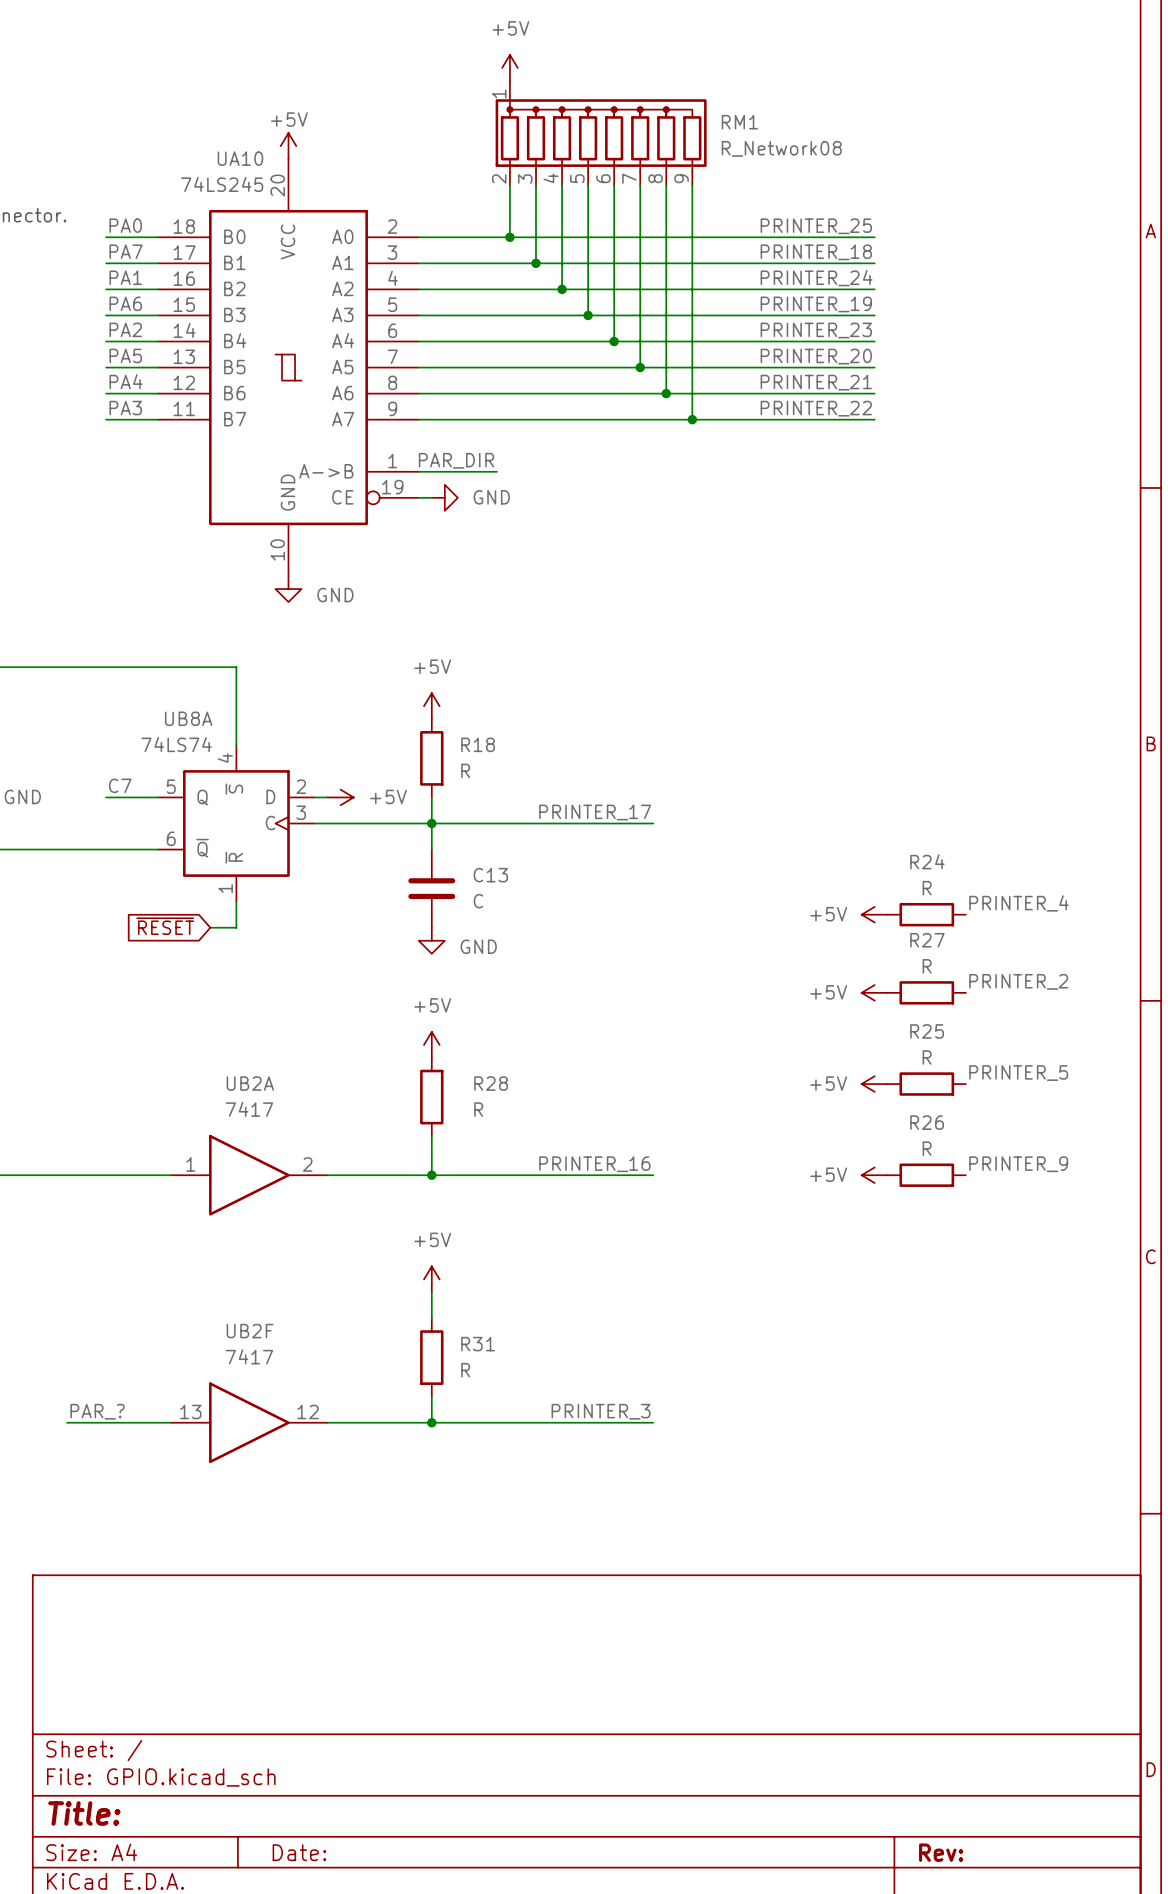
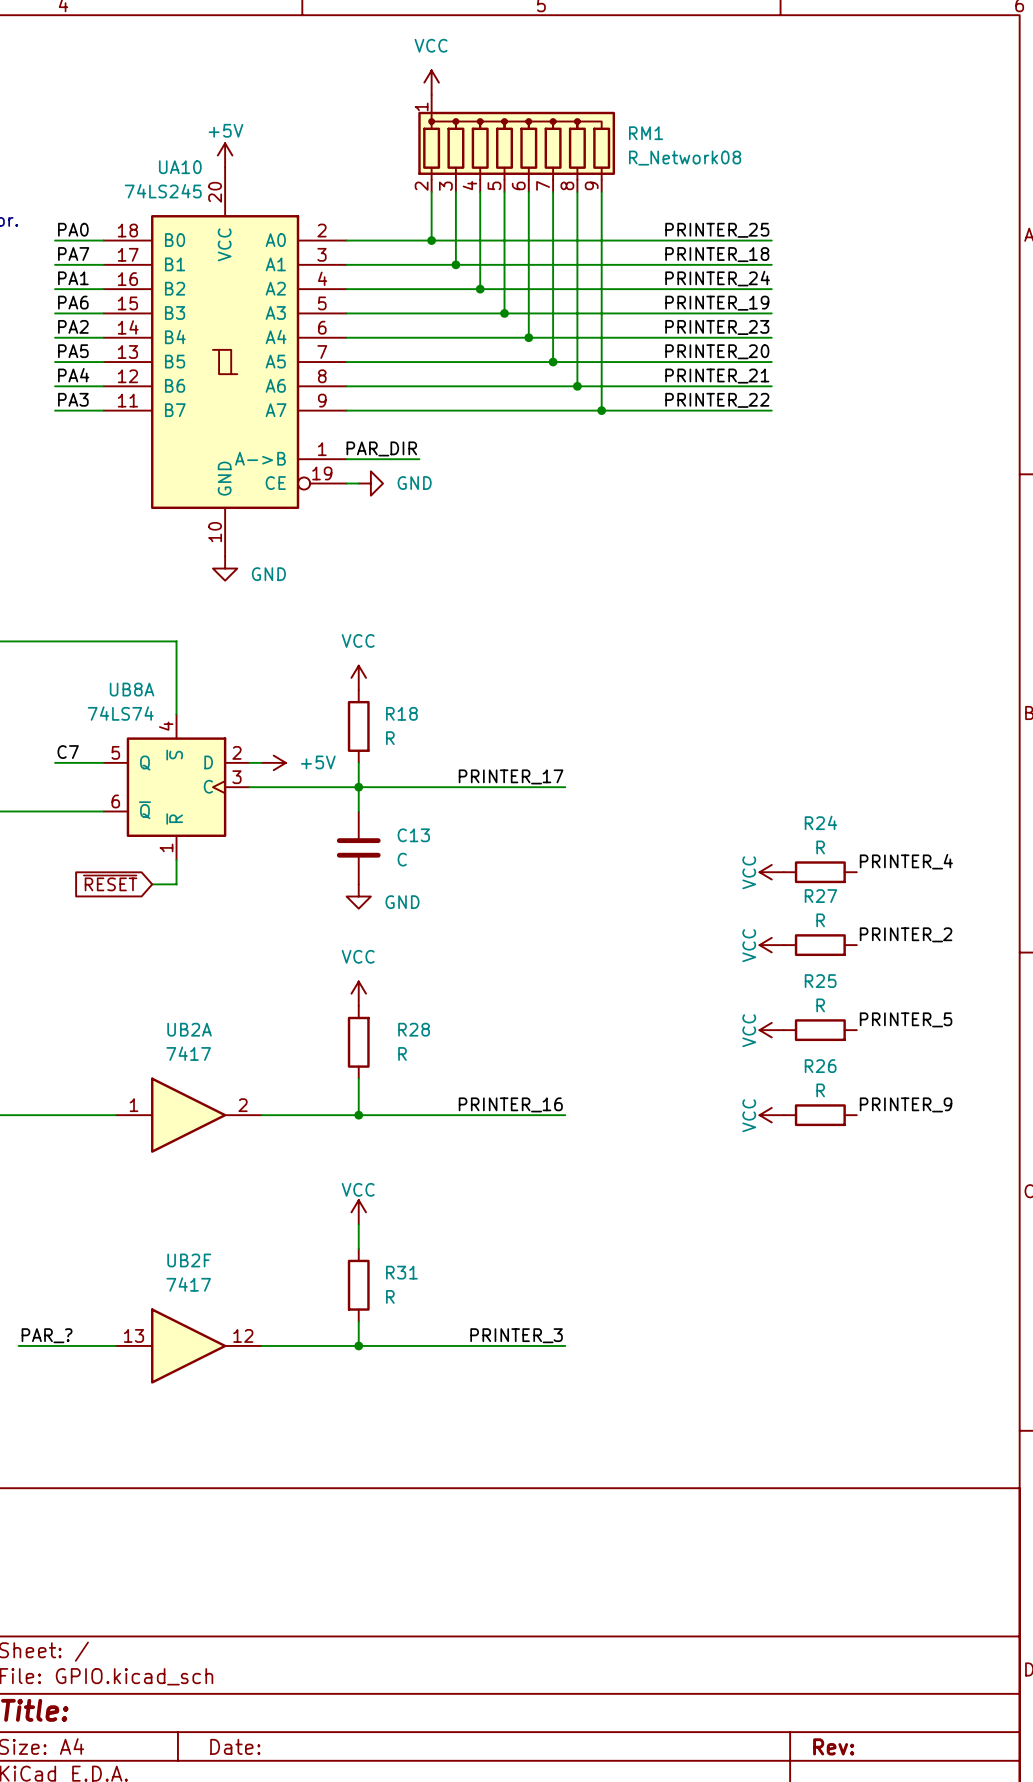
power symbol: +5V (509, 67) -> VCC (431, 82)
power symbol: +5V (431, 706) -> VCC (358, 677)
power symbol: +5V (874, 914) -> VCC (771, 872)
power symbol: +5V (874, 992) -> VCC (771, 945)
power symbol: +5V (431, 1044) -> VCC (358, 993)
power symbol: +5V (874, 1084) -> VCC (771, 1030)
power symbol: +5V (874, 1175) -> VCC (771, 1115)
power symbol: +5V (431, 1279) -> VCC (358, 1212)

